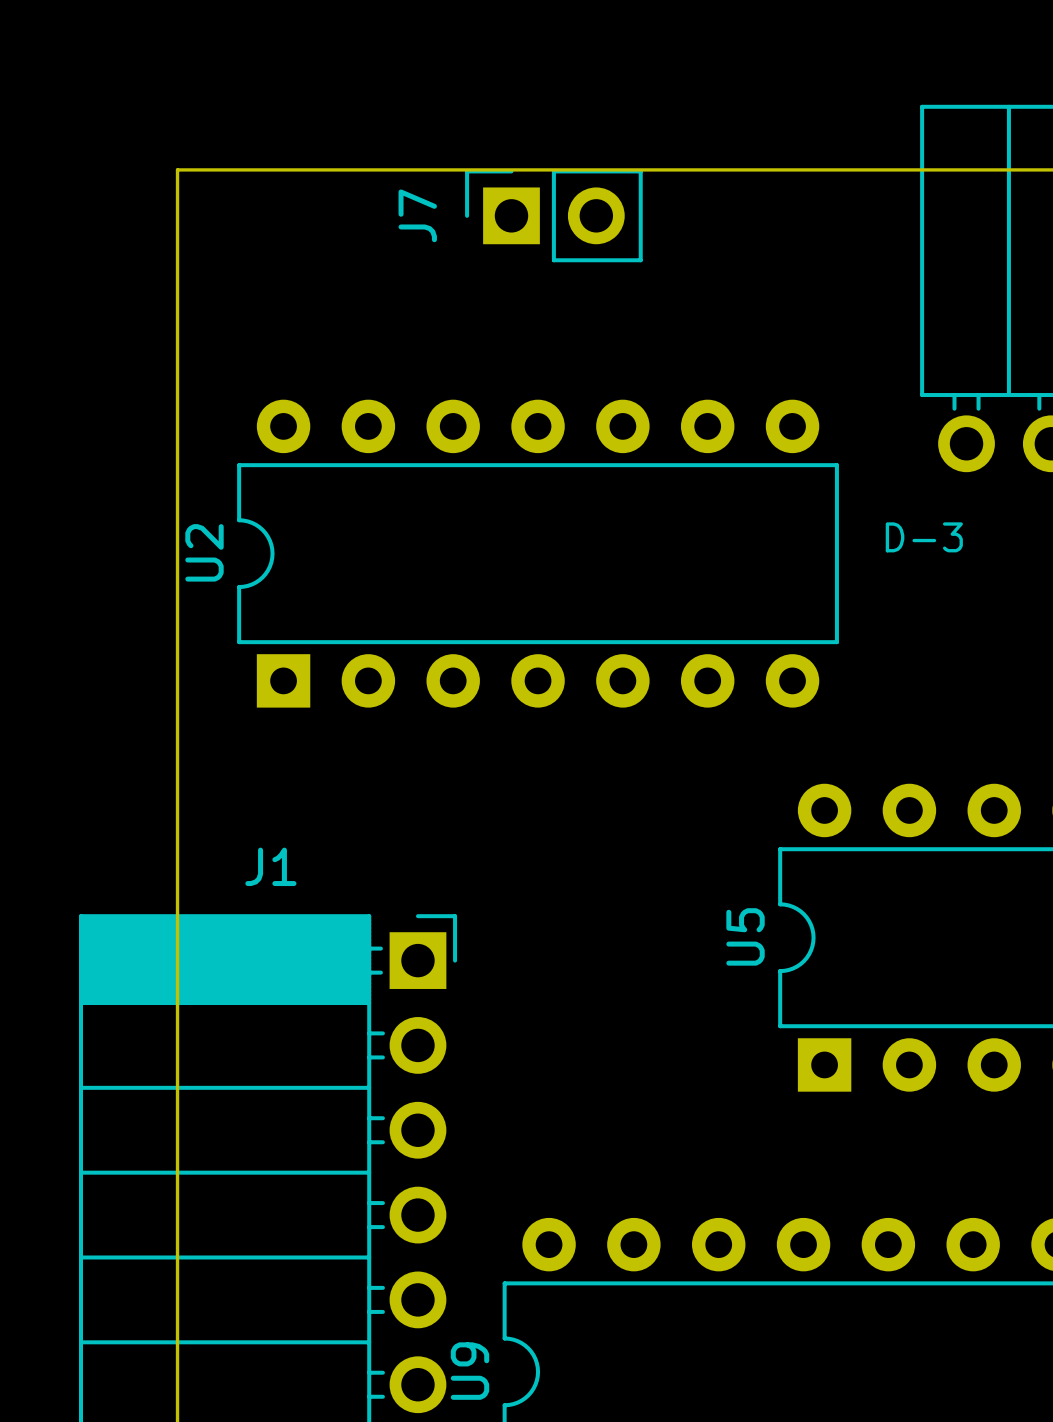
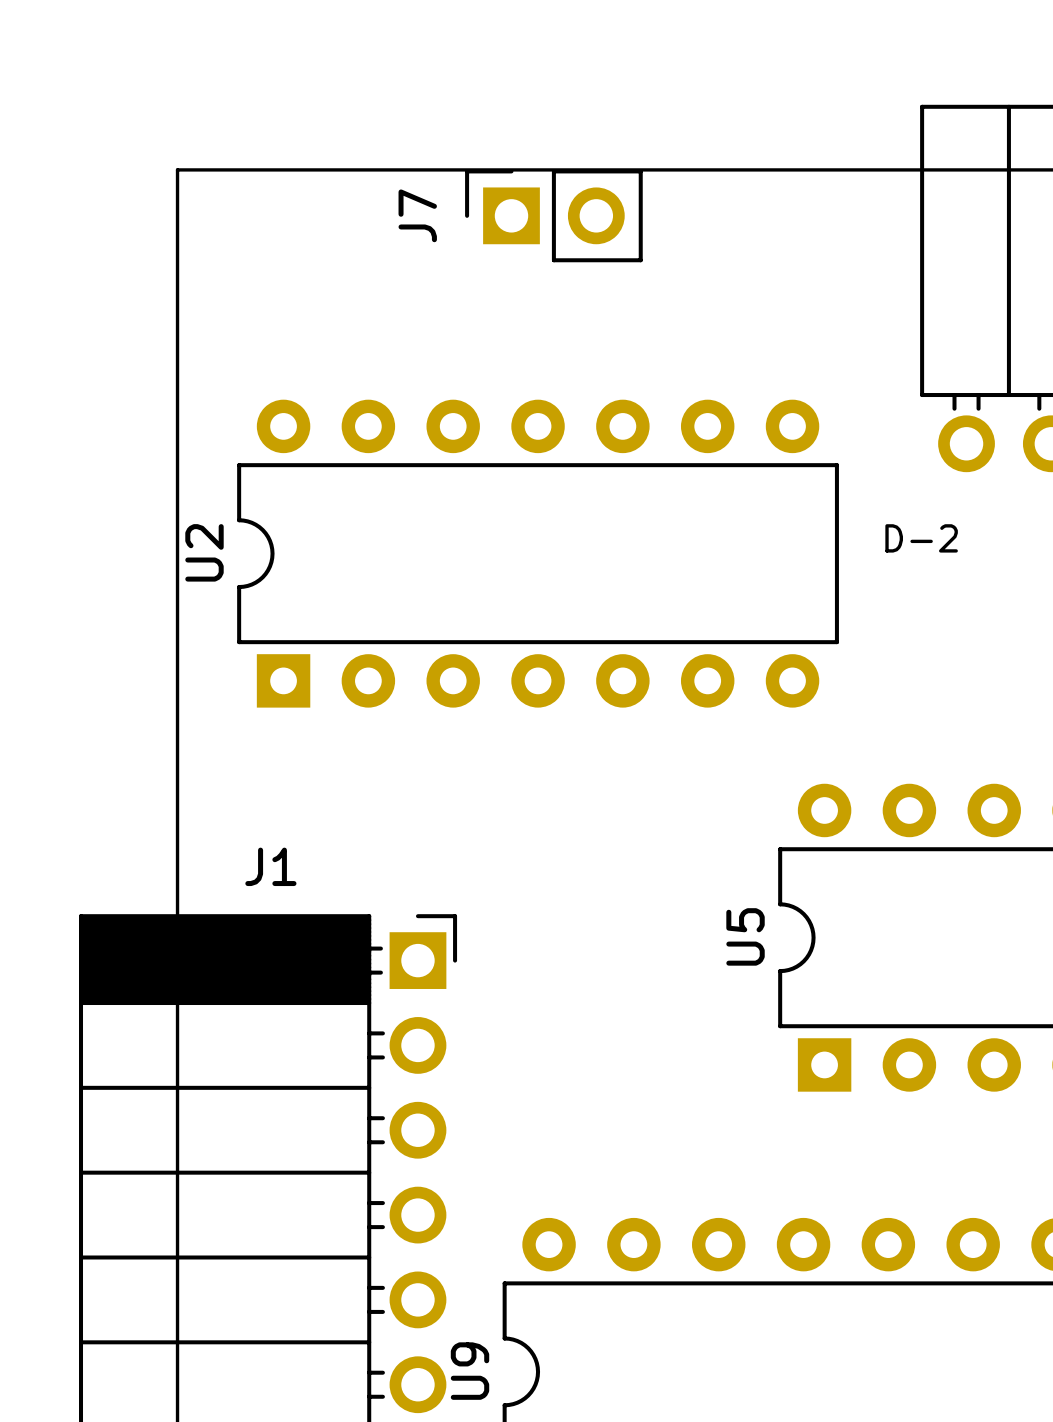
text: D-3 (924, 537) -> D-2 (921, 538)

